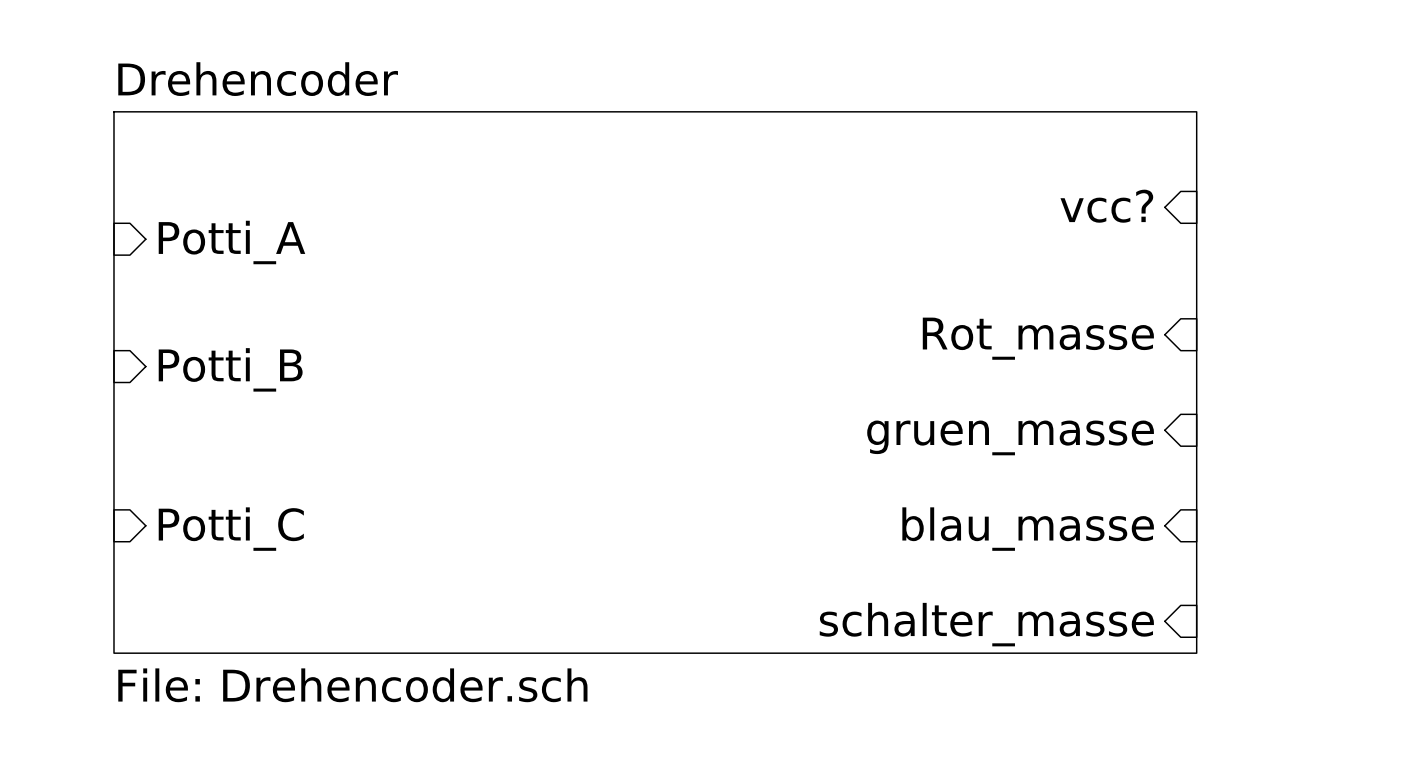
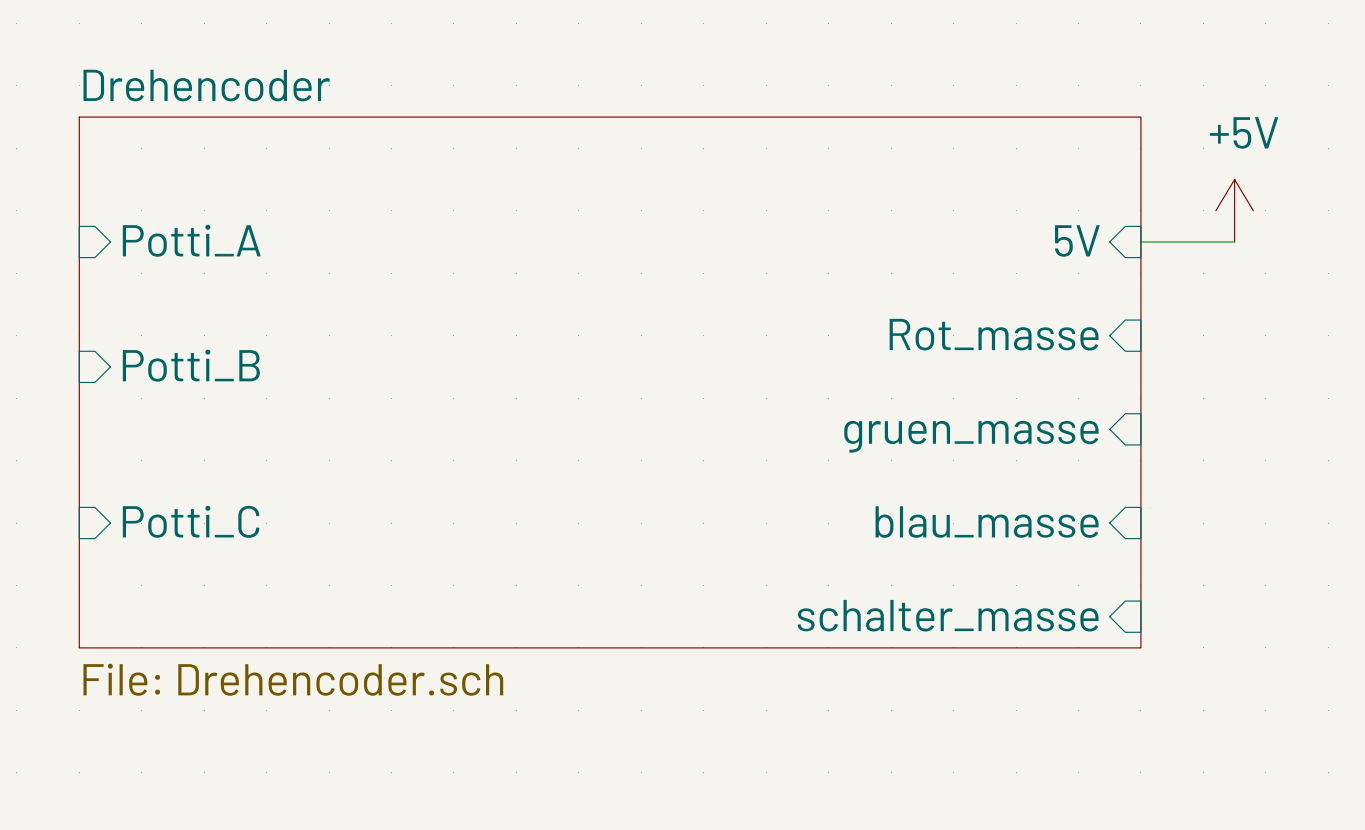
sheet pin: vcc? (1106, 206) -> none
power symbol: none -> +5V (1234, 210)
sheet pin: none -> 5V (1077, 240)
wire: none -> (1140, 241) (1234, 241)

